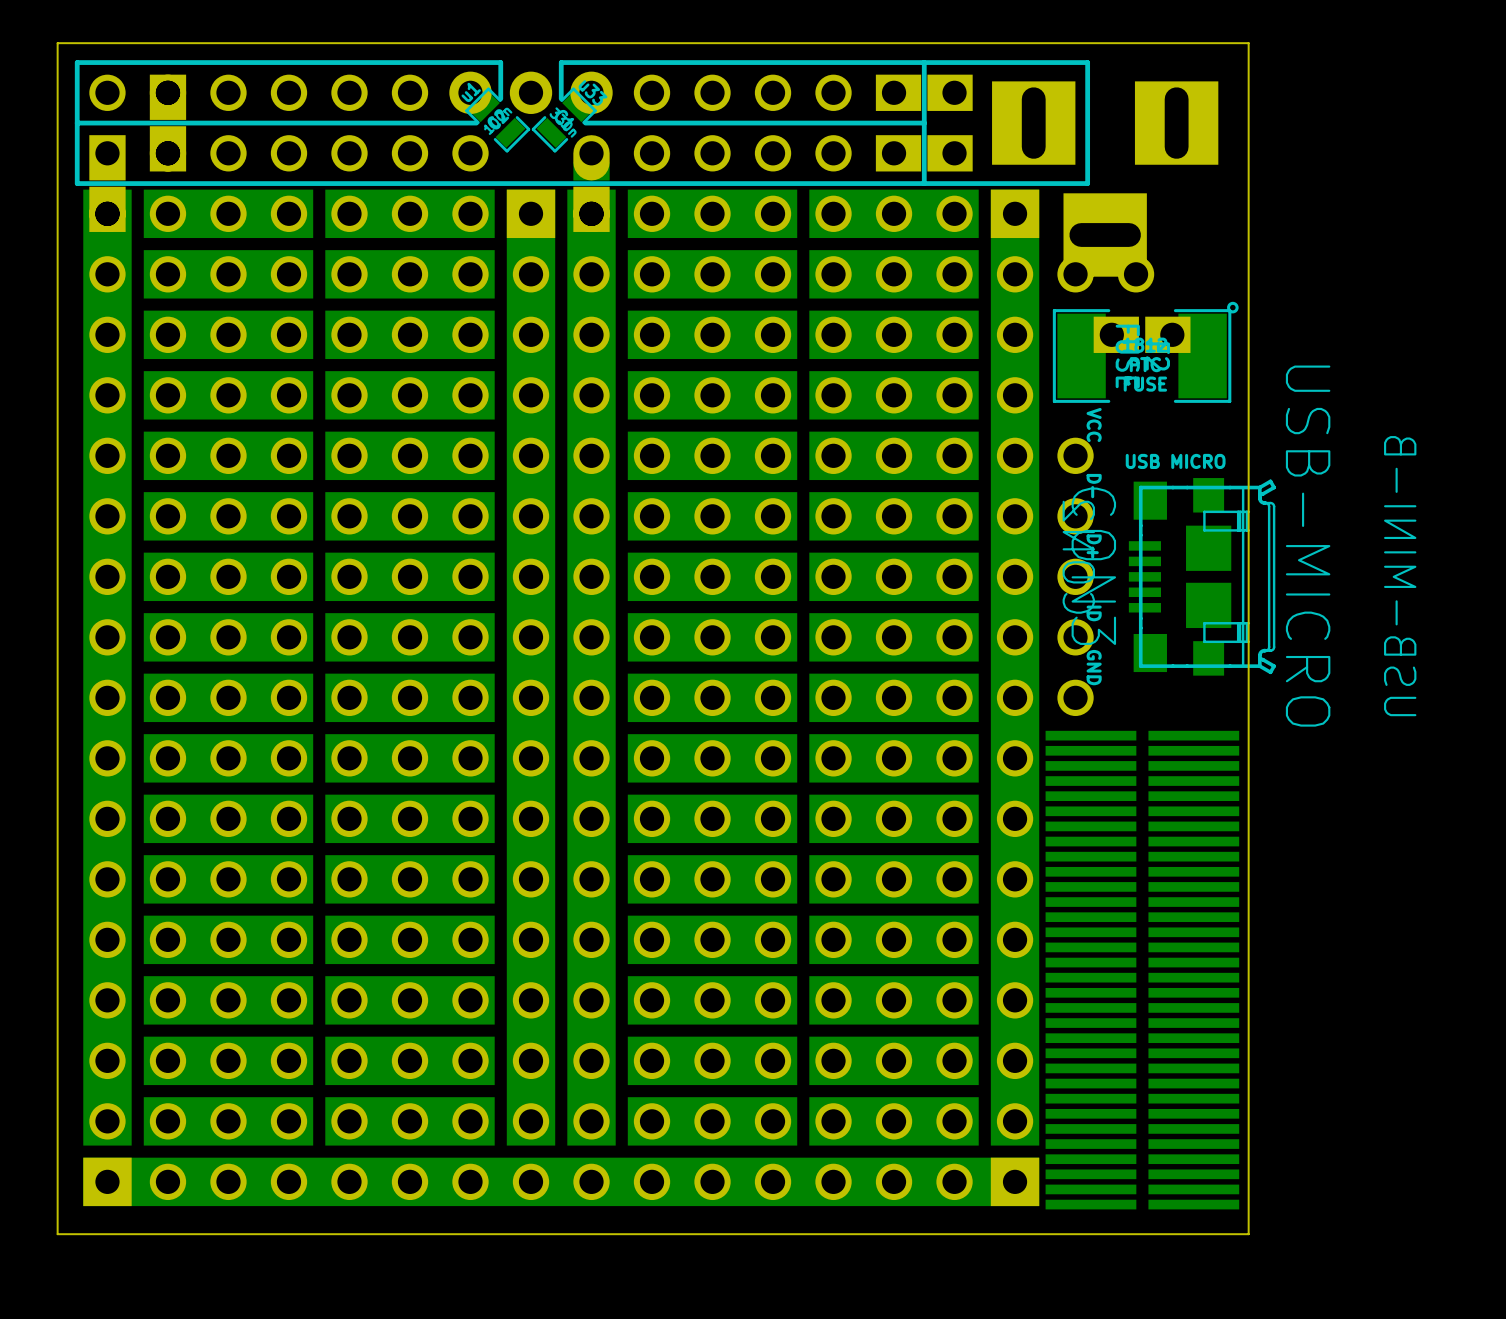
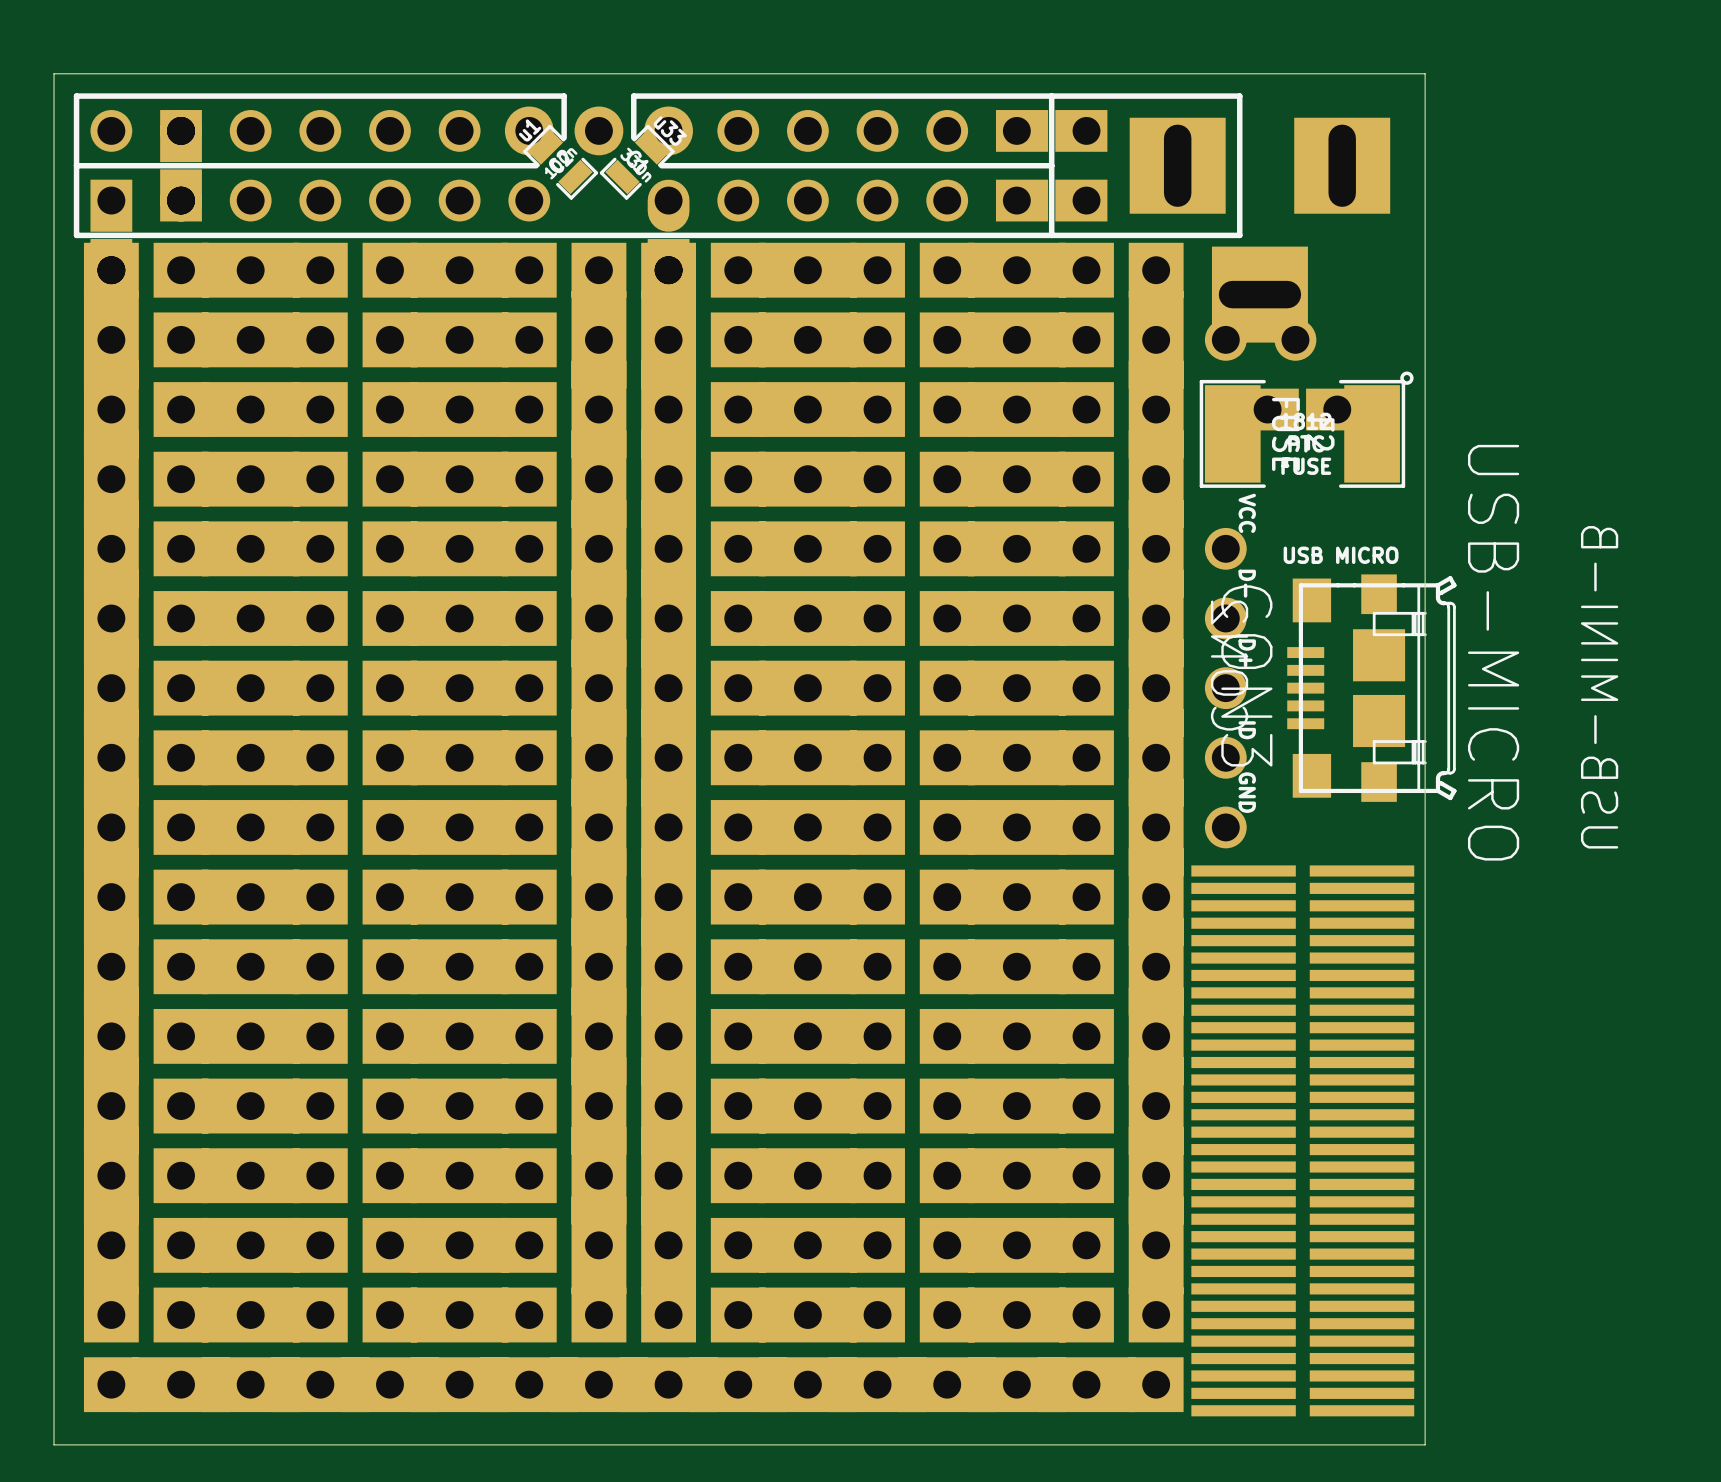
part footprint: [573, 135, 610, 232] -> [647, 179, 690, 292]
part footprint: [83, 189, 132, 1146] -> [83, 242, 139, 1343]
part footprint: [143, 189, 314, 239] -> [153, 242, 348, 298]
part footprint: [325, 189, 495, 239] -> [362, 242, 557, 298]
part footprint: [506, 189, 556, 1146] -> [571, 242, 627, 1343]
part footprint: [567, 189, 616, 1146] -> [641, 242, 697, 1343]
part footprint: [627, 189, 798, 239] -> [710, 242, 905, 298]
part footprint: [809, 189, 979, 239] -> [919, 242, 1114, 298]
part footprint: [990, 189, 1040, 1146] -> [1128, 242, 1184, 1343]
part footprint: [143, 250, 314, 299] -> [153, 312, 348, 368]
part footprint: [325, 250, 495, 299] -> [362, 312, 557, 368]
part footprint: [627, 250, 798, 299] -> [710, 312, 905, 368]
part footprint: [809, 250, 979, 299] -> [919, 312, 1114, 368]
part footprint: [143, 310, 314, 360] -> [153, 382, 348, 437]
part footprint: [325, 310, 495, 360] -> [362, 382, 557, 437]
part footprint: [627, 310, 798, 360] -> [710, 382, 905, 437]
part footprint: [809, 310, 979, 360] -> [919, 382, 1114, 437]
part footprint: [143, 371, 314, 420] -> [153, 451, 348, 507]
part footprint: [325, 371, 495, 420] -> [362, 451, 557, 507]
part footprint: [627, 371, 798, 420] -> [710, 451, 905, 507]
part footprint: [809, 371, 979, 420] -> [919, 451, 1114, 507]
part footprint: [143, 431, 314, 481] -> [153, 521, 348, 577]
part footprint: [325, 431, 495, 481] -> [362, 521, 557, 577]
part footprint: [627, 431, 798, 481] -> [710, 521, 905, 577]
part footprint: [809, 431, 979, 481] -> [919, 521, 1114, 577]
part footprint: [143, 492, 314, 541] -> [153, 591, 348, 646]
part footprint: [325, 492, 495, 541] -> [362, 591, 557, 646]
part footprint: [627, 492, 798, 541] -> [710, 591, 905, 646]
part footprint: [809, 492, 979, 541] -> [919, 591, 1114, 646]
part footprint: [143, 552, 314, 602] -> [153, 660, 348, 716]
part footprint: [325, 552, 495, 602] -> [362, 660, 557, 716]
part footprint: [627, 552, 798, 602] -> [710, 660, 905, 716]
part footprint: [809, 552, 979, 602] -> [919, 660, 1114, 716]
part footprint: [143, 613, 314, 662] -> [153, 730, 348, 786]
part footprint: [325, 613, 495, 662] -> [362, 730, 557, 786]
part footprint: [627, 613, 798, 662] -> [710, 730, 905, 786]
part footprint: [809, 613, 979, 662] -> [919, 730, 1114, 786]
part footprint: [143, 673, 314, 723] -> [153, 800, 348, 855]
part footprint: [325, 673, 495, 723] -> [362, 800, 557, 855]
part footprint: [627, 673, 798, 723] -> [710, 800, 905, 855]
part footprint: [809, 673, 979, 723] -> [919, 800, 1114, 855]
part footprint: [143, 734, 314, 783] -> [153, 869, 348, 925]
part footprint: [325, 734, 495, 783] -> [362, 869, 557, 925]
part footprint: [627, 734, 798, 783] -> [710, 869, 905, 925]
part footprint: [809, 734, 979, 783] -> [919, 869, 1114, 925]
part footprint: [143, 794, 314, 844] -> [153, 939, 348, 995]
part footprint: [325, 794, 495, 844] -> [362, 939, 557, 995]
part footprint: [627, 794, 798, 844] -> [710, 939, 905, 995]
part footprint: [809, 794, 979, 844] -> [919, 939, 1114, 995]
part footprint: [143, 855, 314, 904] -> [153, 1008, 348, 1064]
part footprint: [325, 855, 495, 904] -> [362, 1008, 557, 1064]
part footprint: [627, 855, 798, 904] -> [710, 1008, 905, 1064]
part footprint: [809, 855, 979, 904] -> [919, 1008, 1114, 1064]
part footprint: [143, 915, 314, 965] -> [153, 1078, 348, 1134]
part footprint: [325, 915, 495, 965] -> [362, 1078, 557, 1134]
part footprint: [627, 915, 798, 965] -> [710, 1078, 905, 1134]
part footprint: [809, 915, 979, 965] -> [919, 1078, 1114, 1134]
part footprint: [143, 976, 314, 1025] -> [153, 1148, 348, 1204]
part footprint: [325, 976, 495, 1025] -> [362, 1148, 557, 1204]
part footprint: [627, 976, 798, 1025] -> [710, 1148, 905, 1204]
part footprint: [809, 976, 979, 1025] -> [919, 1148, 1114, 1204]
part footprint: [143, 1036, 314, 1086] -> [153, 1217, 348, 1273]
part footprint: [325, 1036, 495, 1086] -> [362, 1217, 557, 1273]
part footprint: [627, 1036, 798, 1086] -> [710, 1217, 905, 1273]
part footprint: [809, 1036, 979, 1086] -> [919, 1217, 1114, 1273]
part footprint: [143, 1097, 314, 1146] -> [153, 1287, 348, 1343]
part footprint: [325, 1097, 495, 1146] -> [362, 1287, 557, 1343]
part footprint: [627, 1097, 798, 1146] -> [710, 1287, 905, 1343]
part footprint: [809, 1097, 979, 1146] -> [919, 1287, 1114, 1343]
part footprint: [83, 1157, 1040, 1207] -> [83, 1357, 1184, 1413]

